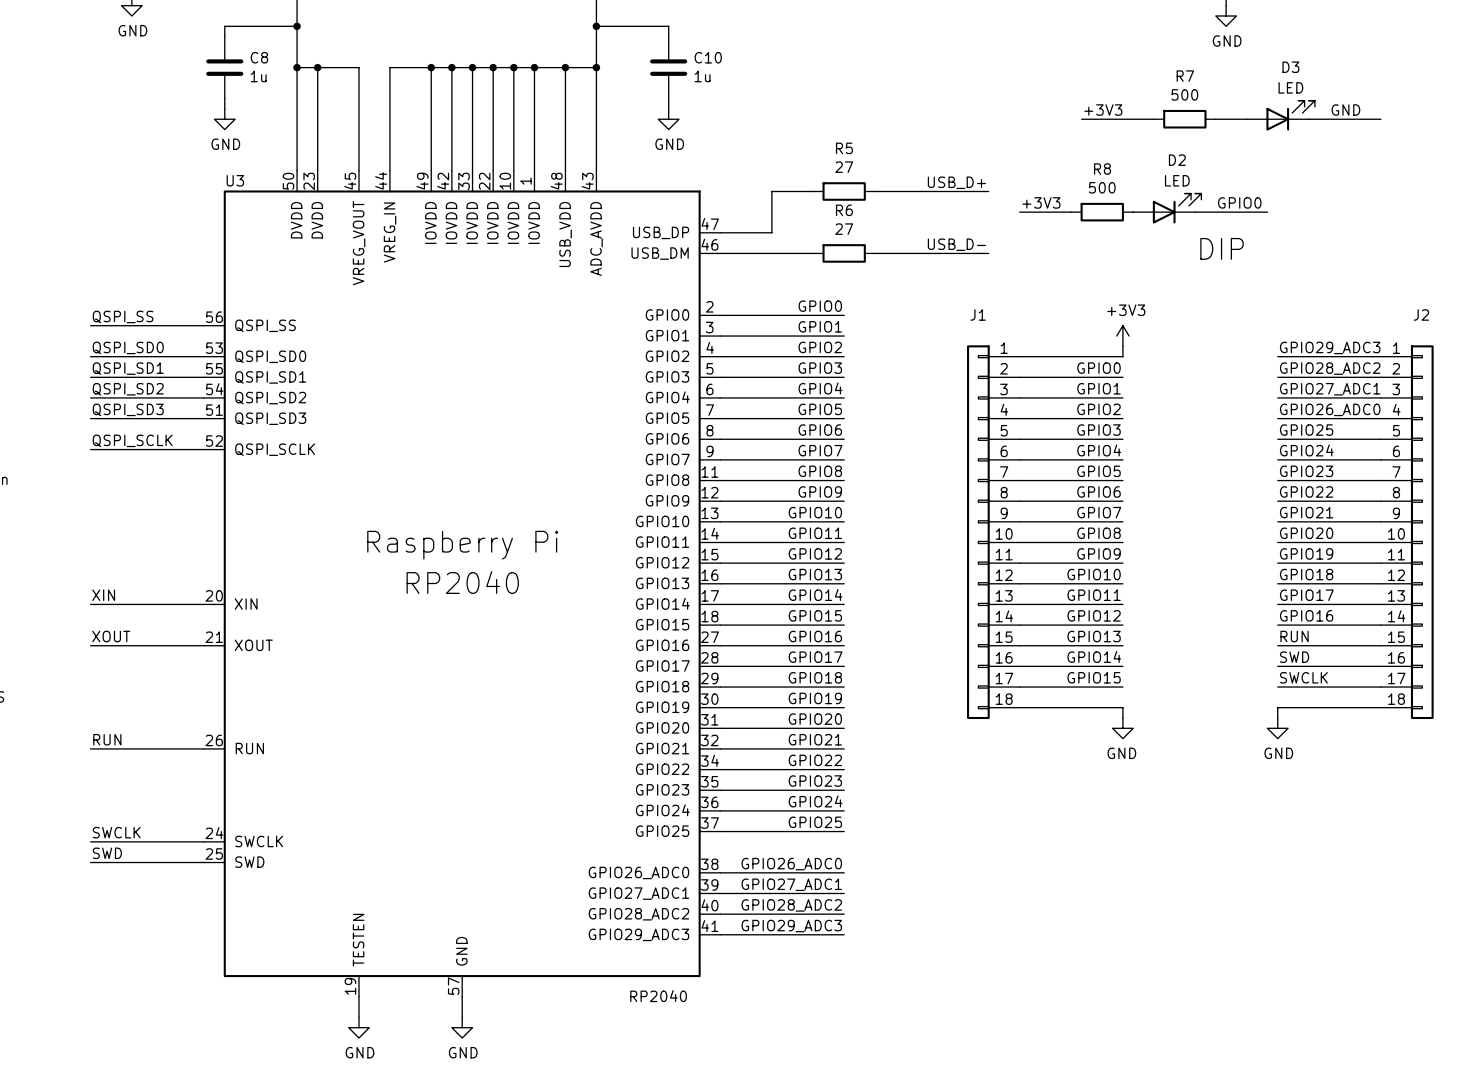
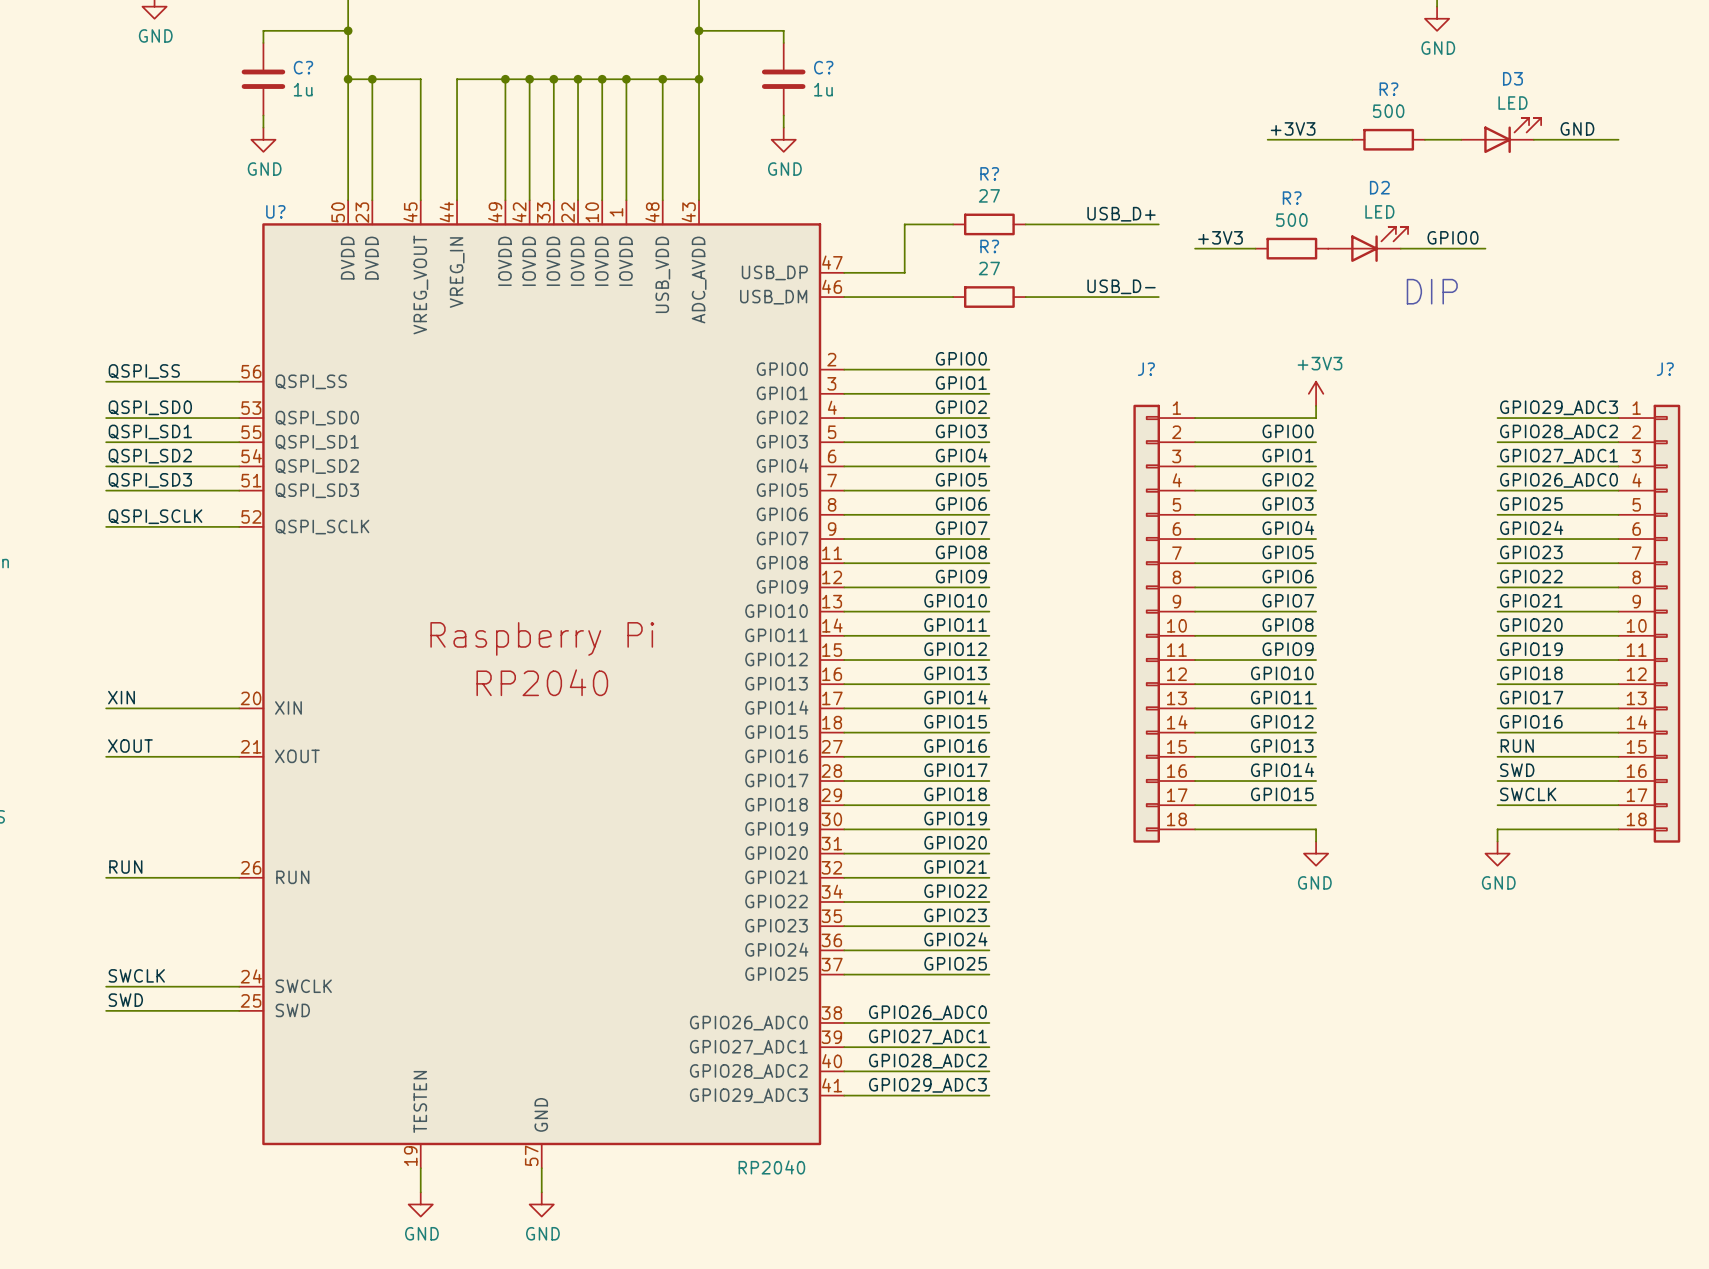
C8 name: C8 (259, 57) -> C? (303, 67)
C10 name: C10 (708, 57) -> C? (823, 67)
R7 name: R7 (1185, 76) -> R? (1388, 89)
R5 name: R5 (844, 148) -> R? (989, 173)
R8 name: R8 (1102, 169) -> R? (1292, 198)
U3 name: U3 (235, 180) -> U? (275, 211)
R6 name: R6 (844, 210) -> R? (989, 246)
J1 name: J1 (978, 314) -> J? (1146, 369)
J2 name: J2 (1421, 314) -> J? (1665, 369)

